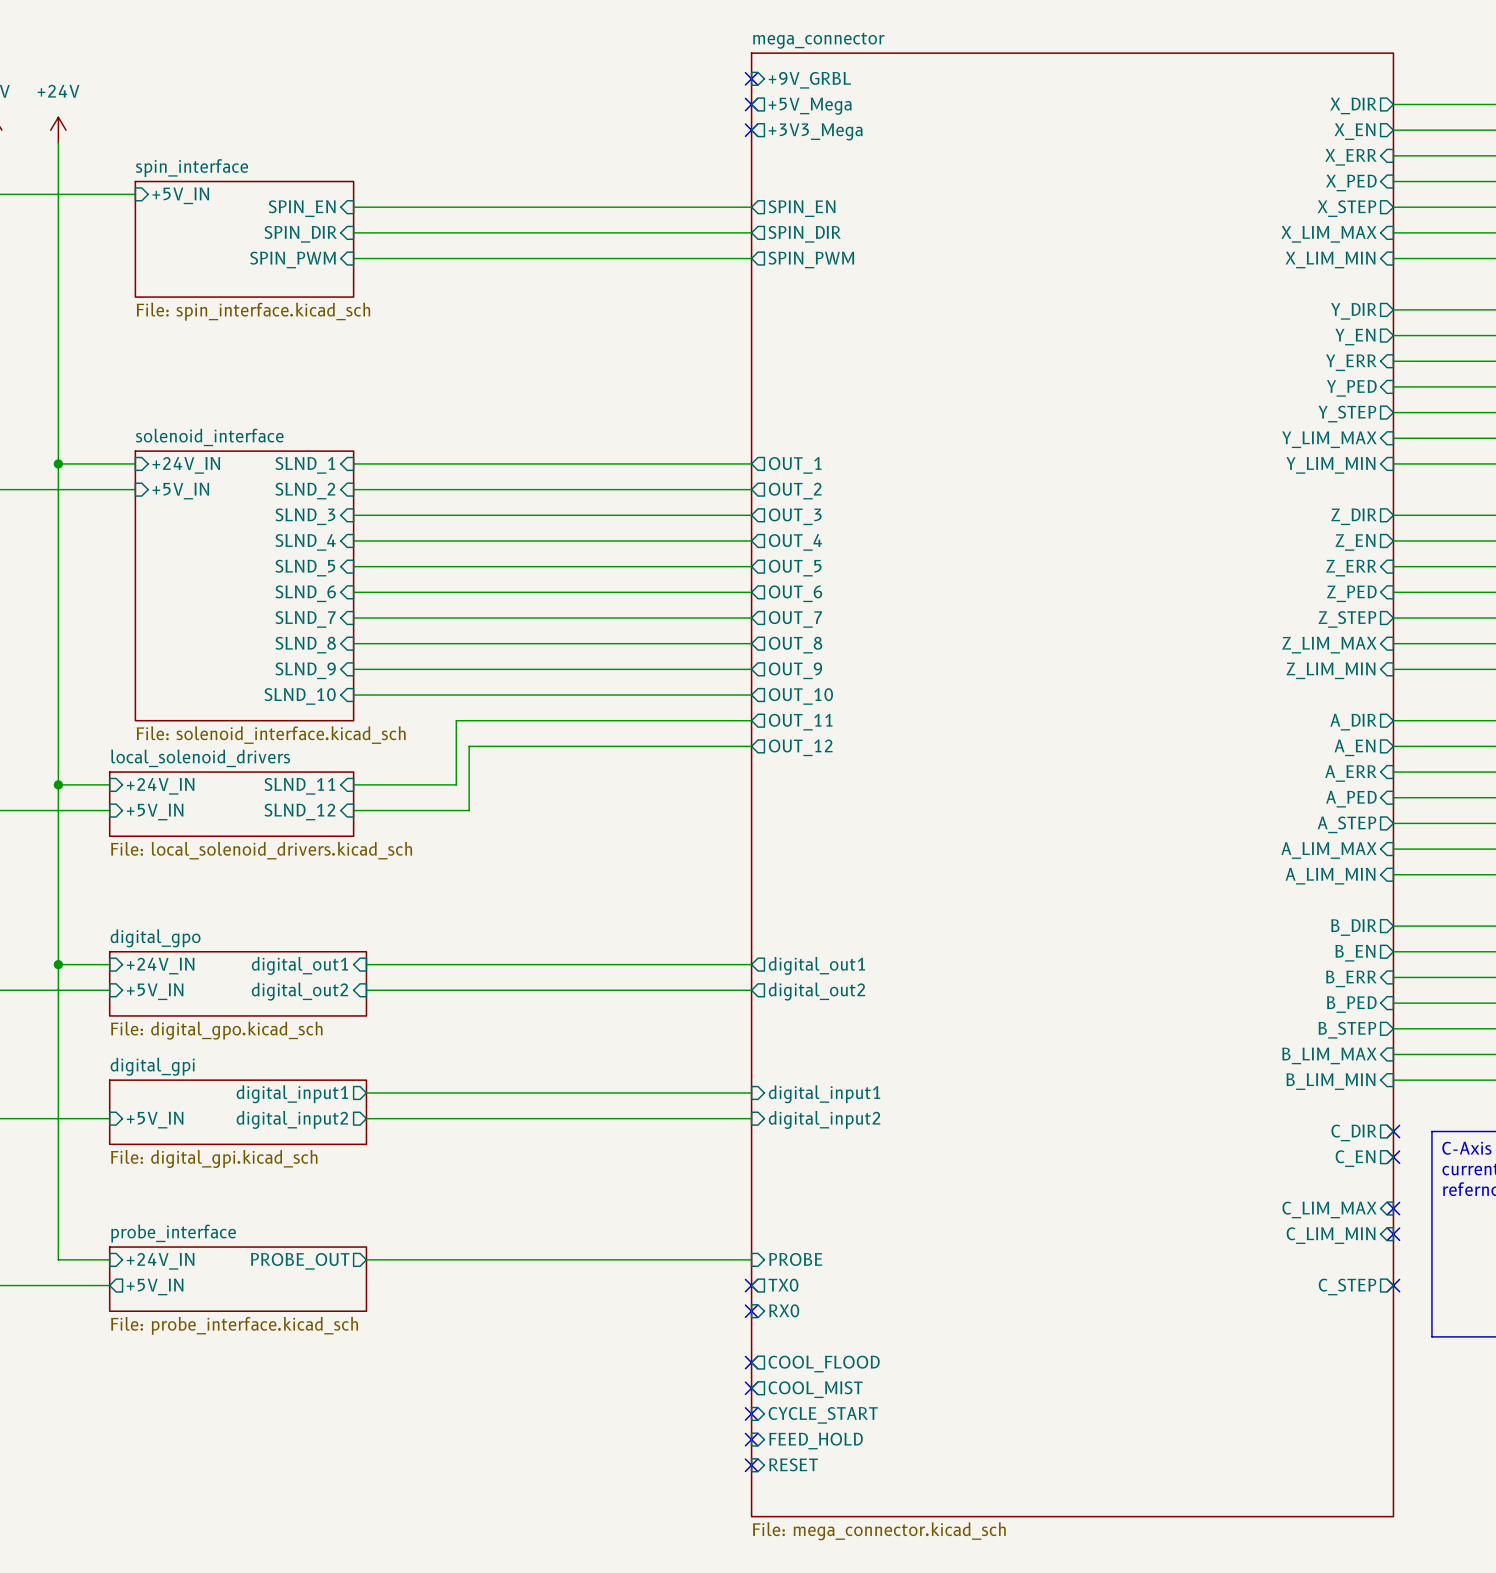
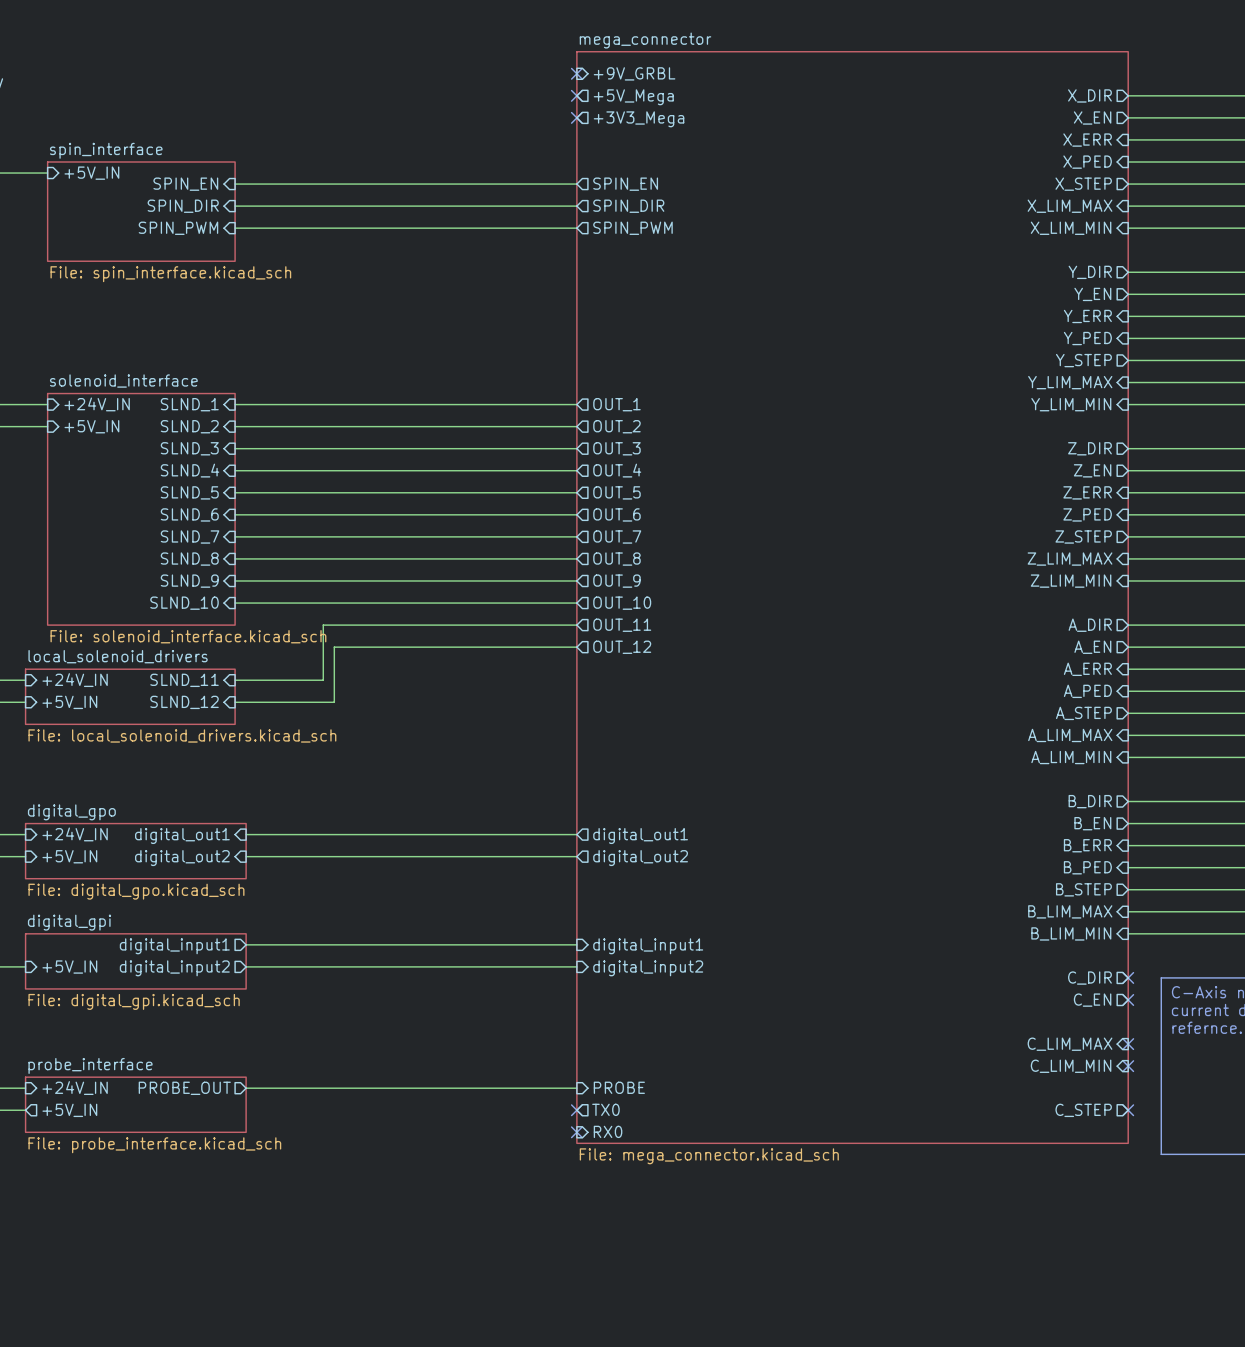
sheet mega_connector: none -> File: mega_connector.kicad_sch (852, 597)
sheet mega_connector: File: mega_connector.kicad_sch (1072, 784) -> none
no-connect mark: (751, 1362) -> none
sheet pin: COOL_FLOOD (824, 1364) -> none
no-connect mark: (751, 1388) -> none
sheet pin: COOL_MIST (815, 1389) -> none
no-connect mark: (751, 1413) -> none
sheet pin: CYCLE_START (823, 1415) -> none
no-connect mark: (751, 1439) -> none
sheet pin: FEED_HOLD (816, 1441) -> none
sheet pin: RESET (793, 1464) -> none
no-connect mark: (751, 1465) -> none

